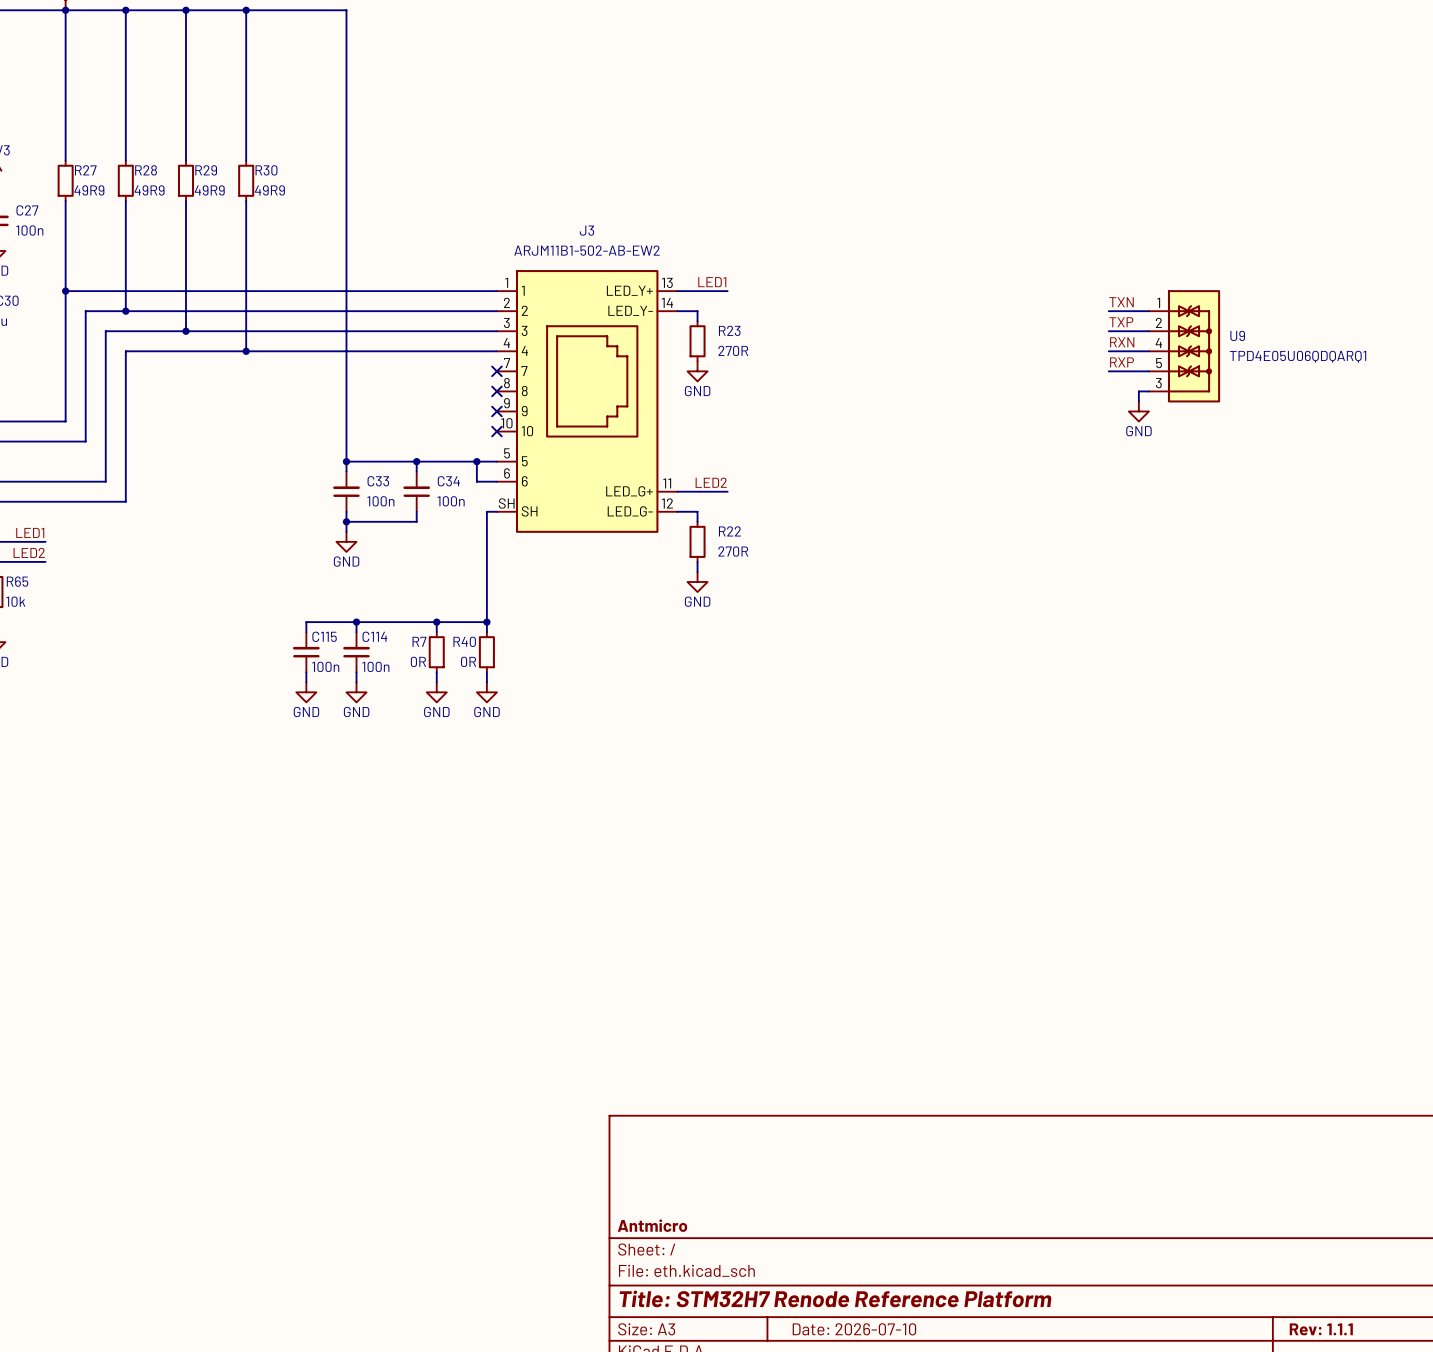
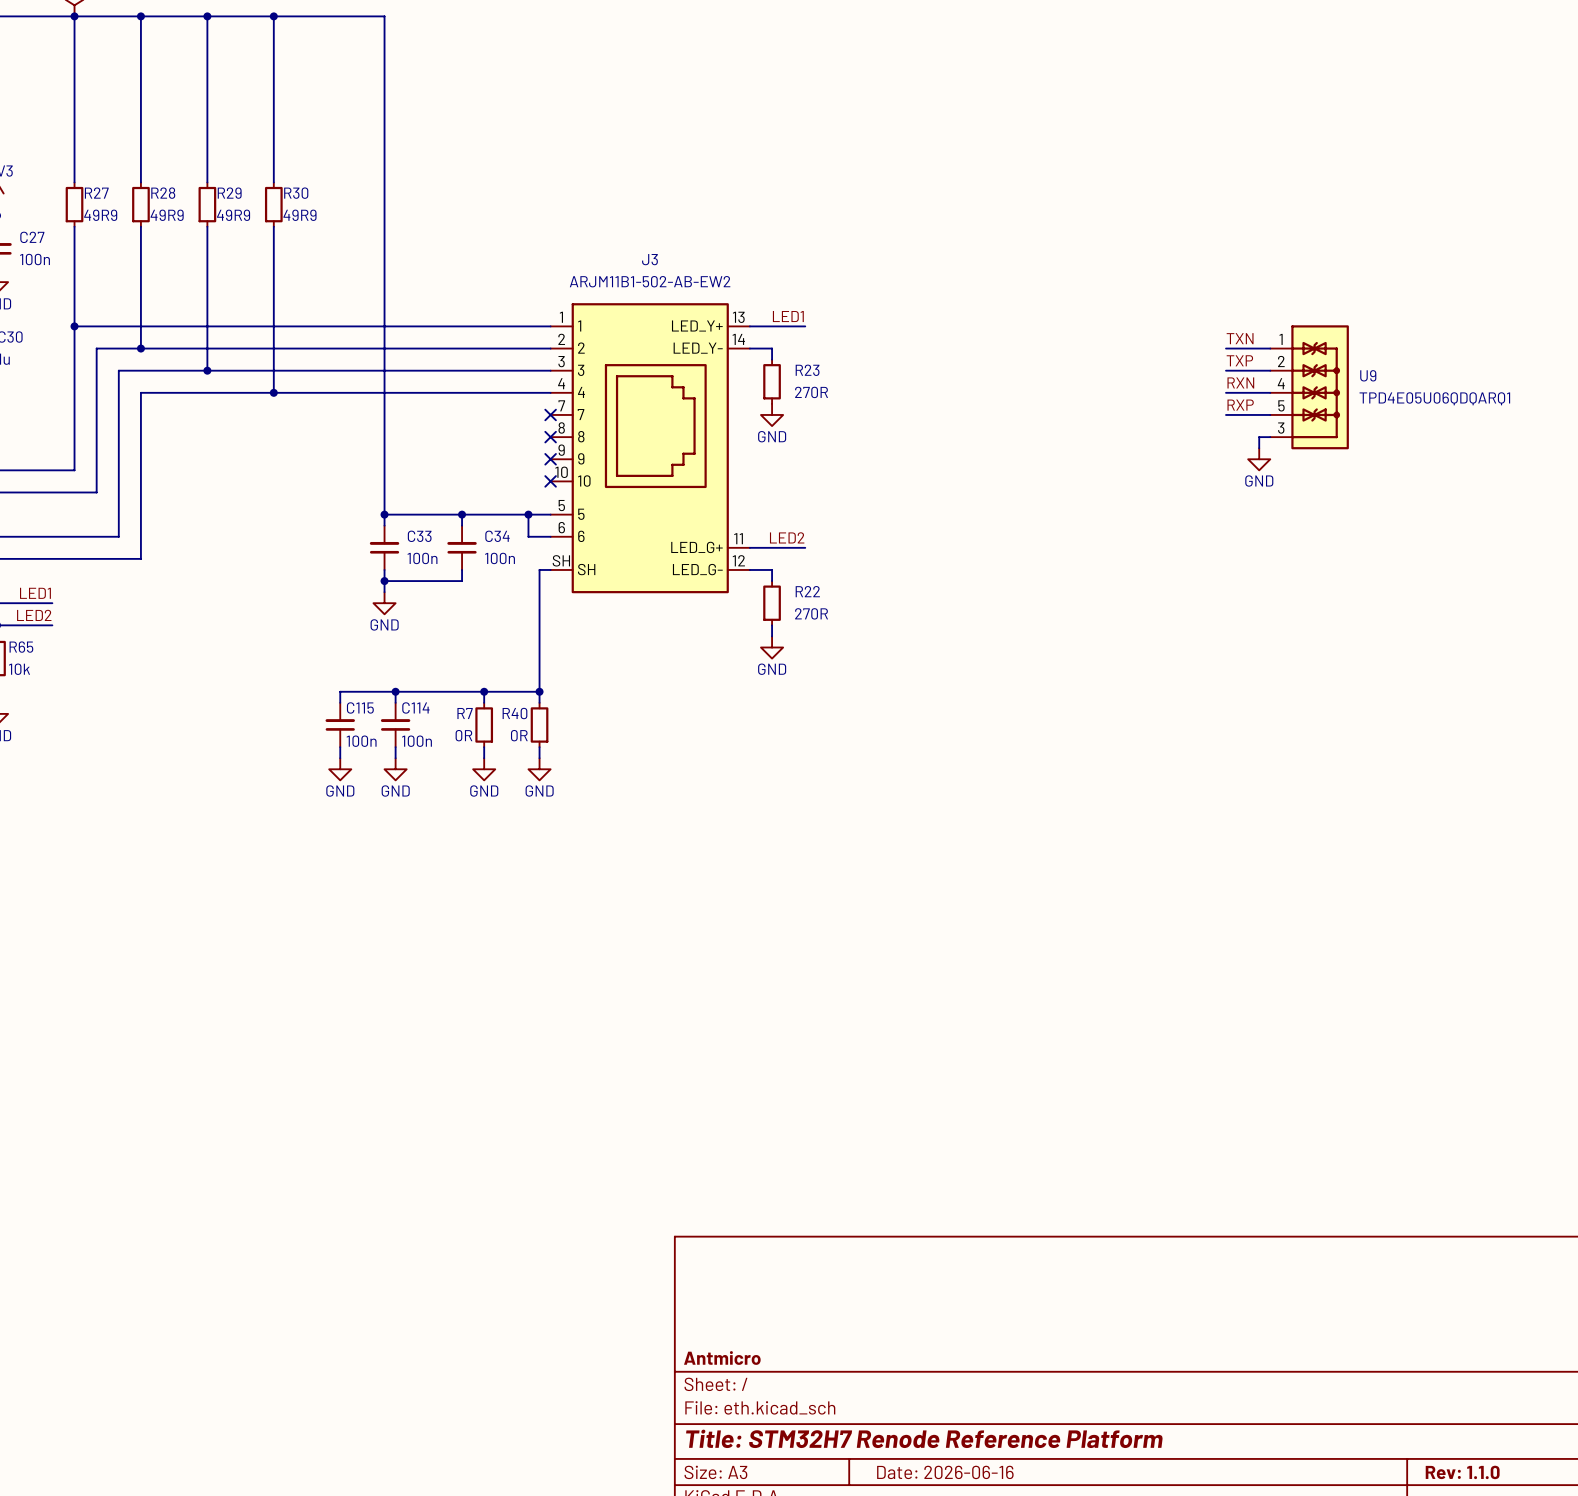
title block: Date: 2026-07-10 (854, 1329) -> Date: 2026-06-16 (945, 1472)
title block: Rev: 1.1.1 (1321, 1329) -> Rev: 1.1.0 (1462, 1472)

